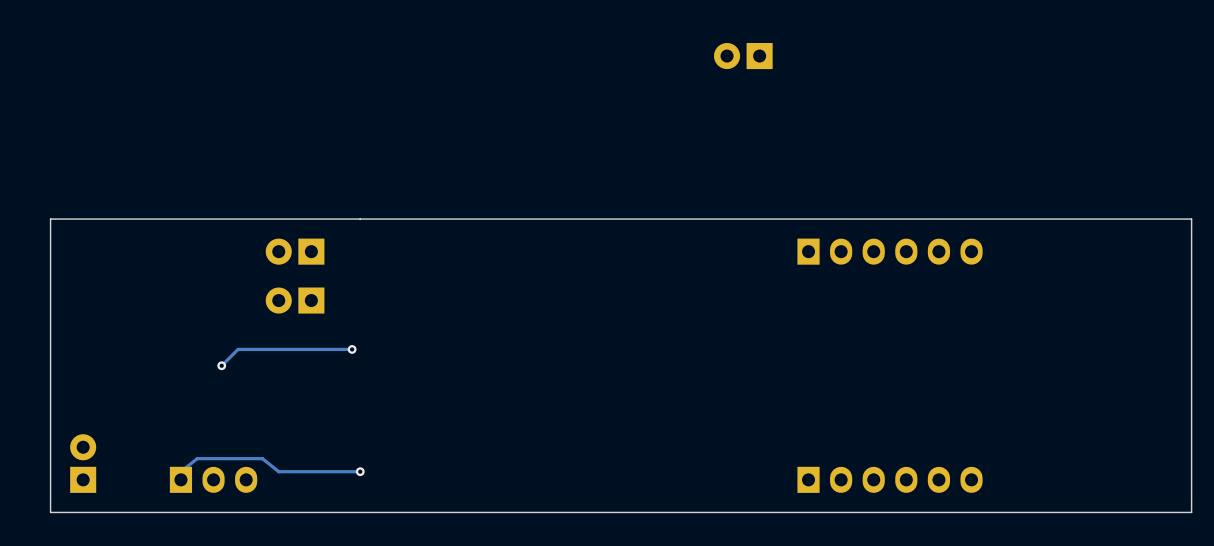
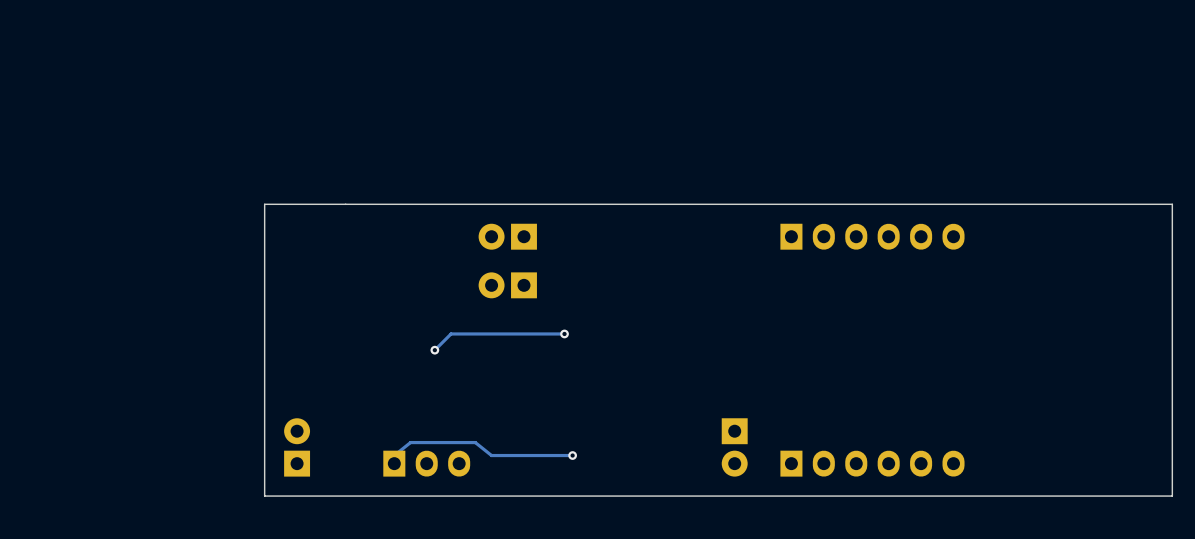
part: (743, 56) -> none
board edge: (278, 219) (50, 219) (50, 512) (278, 512) -> (264, 204) (264, 496)
part: (295, 251) -> none
part: none -> (507, 236)
part: (295, 300) -> none
part: none -> (507, 285)
track: (352, 349) (238, 349) (221, 365) -> (564, 333) (451, 333) (434, 350)
via: (352, 349) -> none
via: none -> (564, 333)
via: (221, 365) -> none
via: none -> (434, 350)
part: (83, 463) -> none
part: none -> (297, 447)
part: none -> (734, 447)
track: (360, 471) (278, 471) (262, 458) (197, 458) (180, 471) (180, 479) -> (572, 455) (491, 455) (475, 442) (410, 442) (394, 455) (394, 463)
via: (360, 471) -> none
via: none -> (572, 455)
part position: (213, 479) -> (426, 463)

